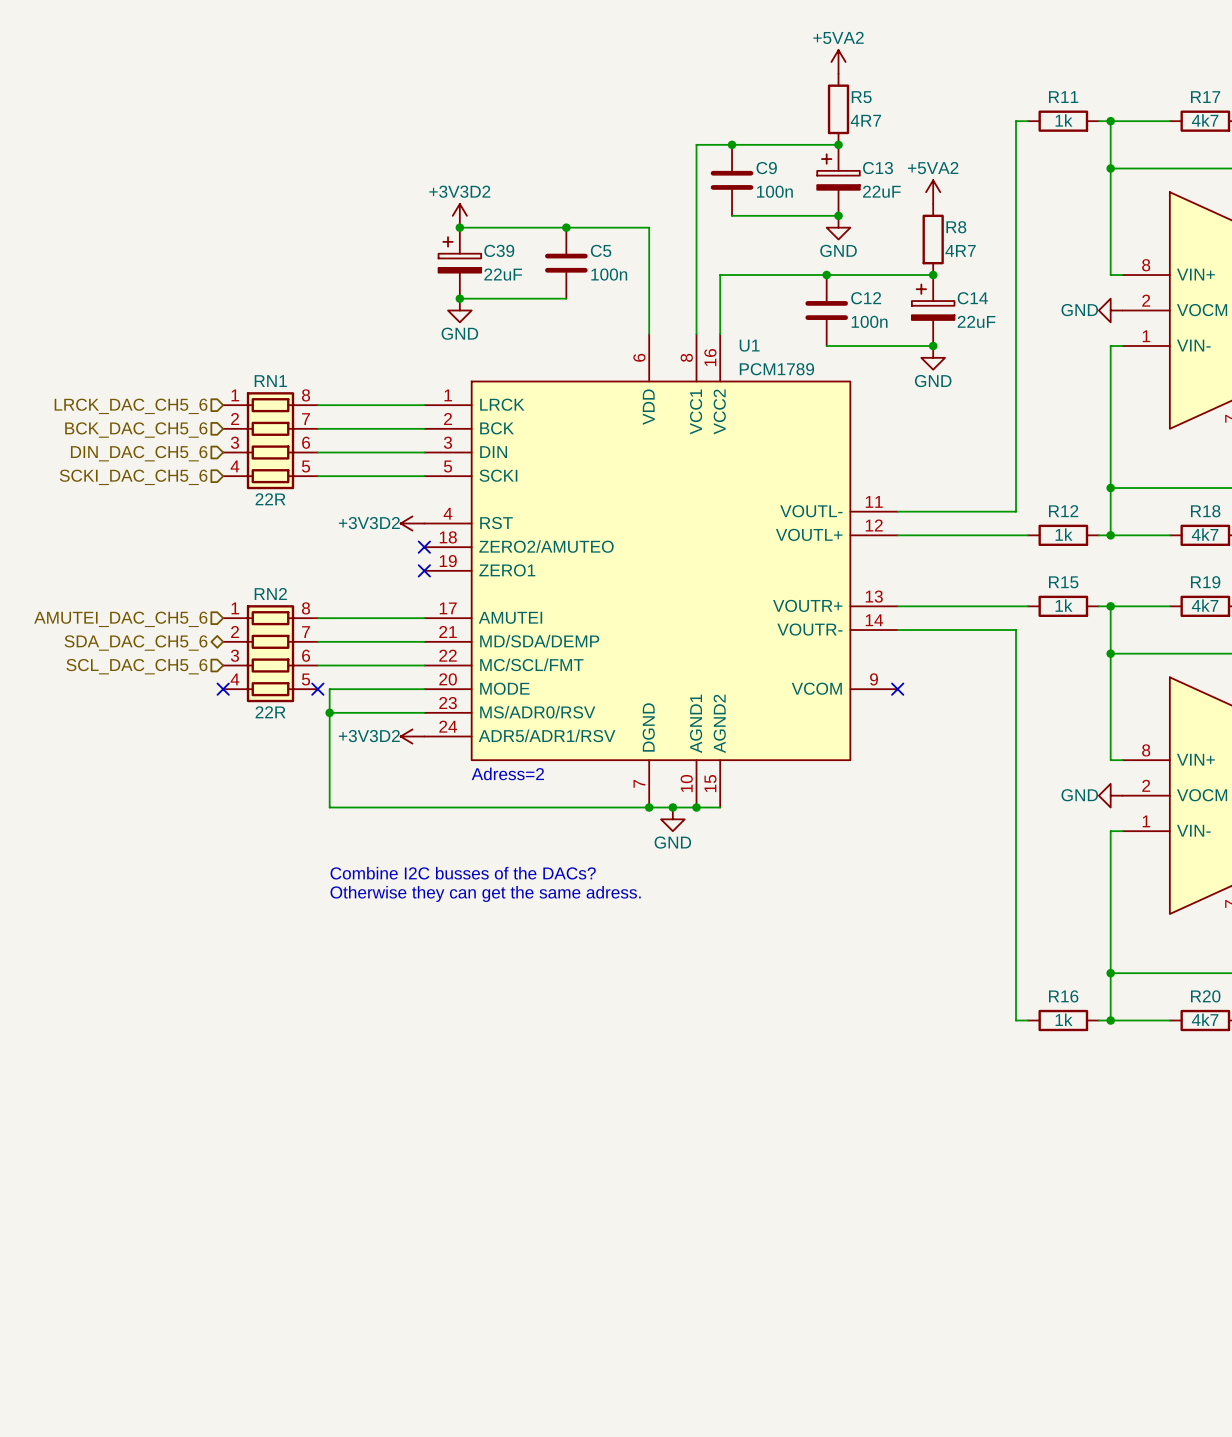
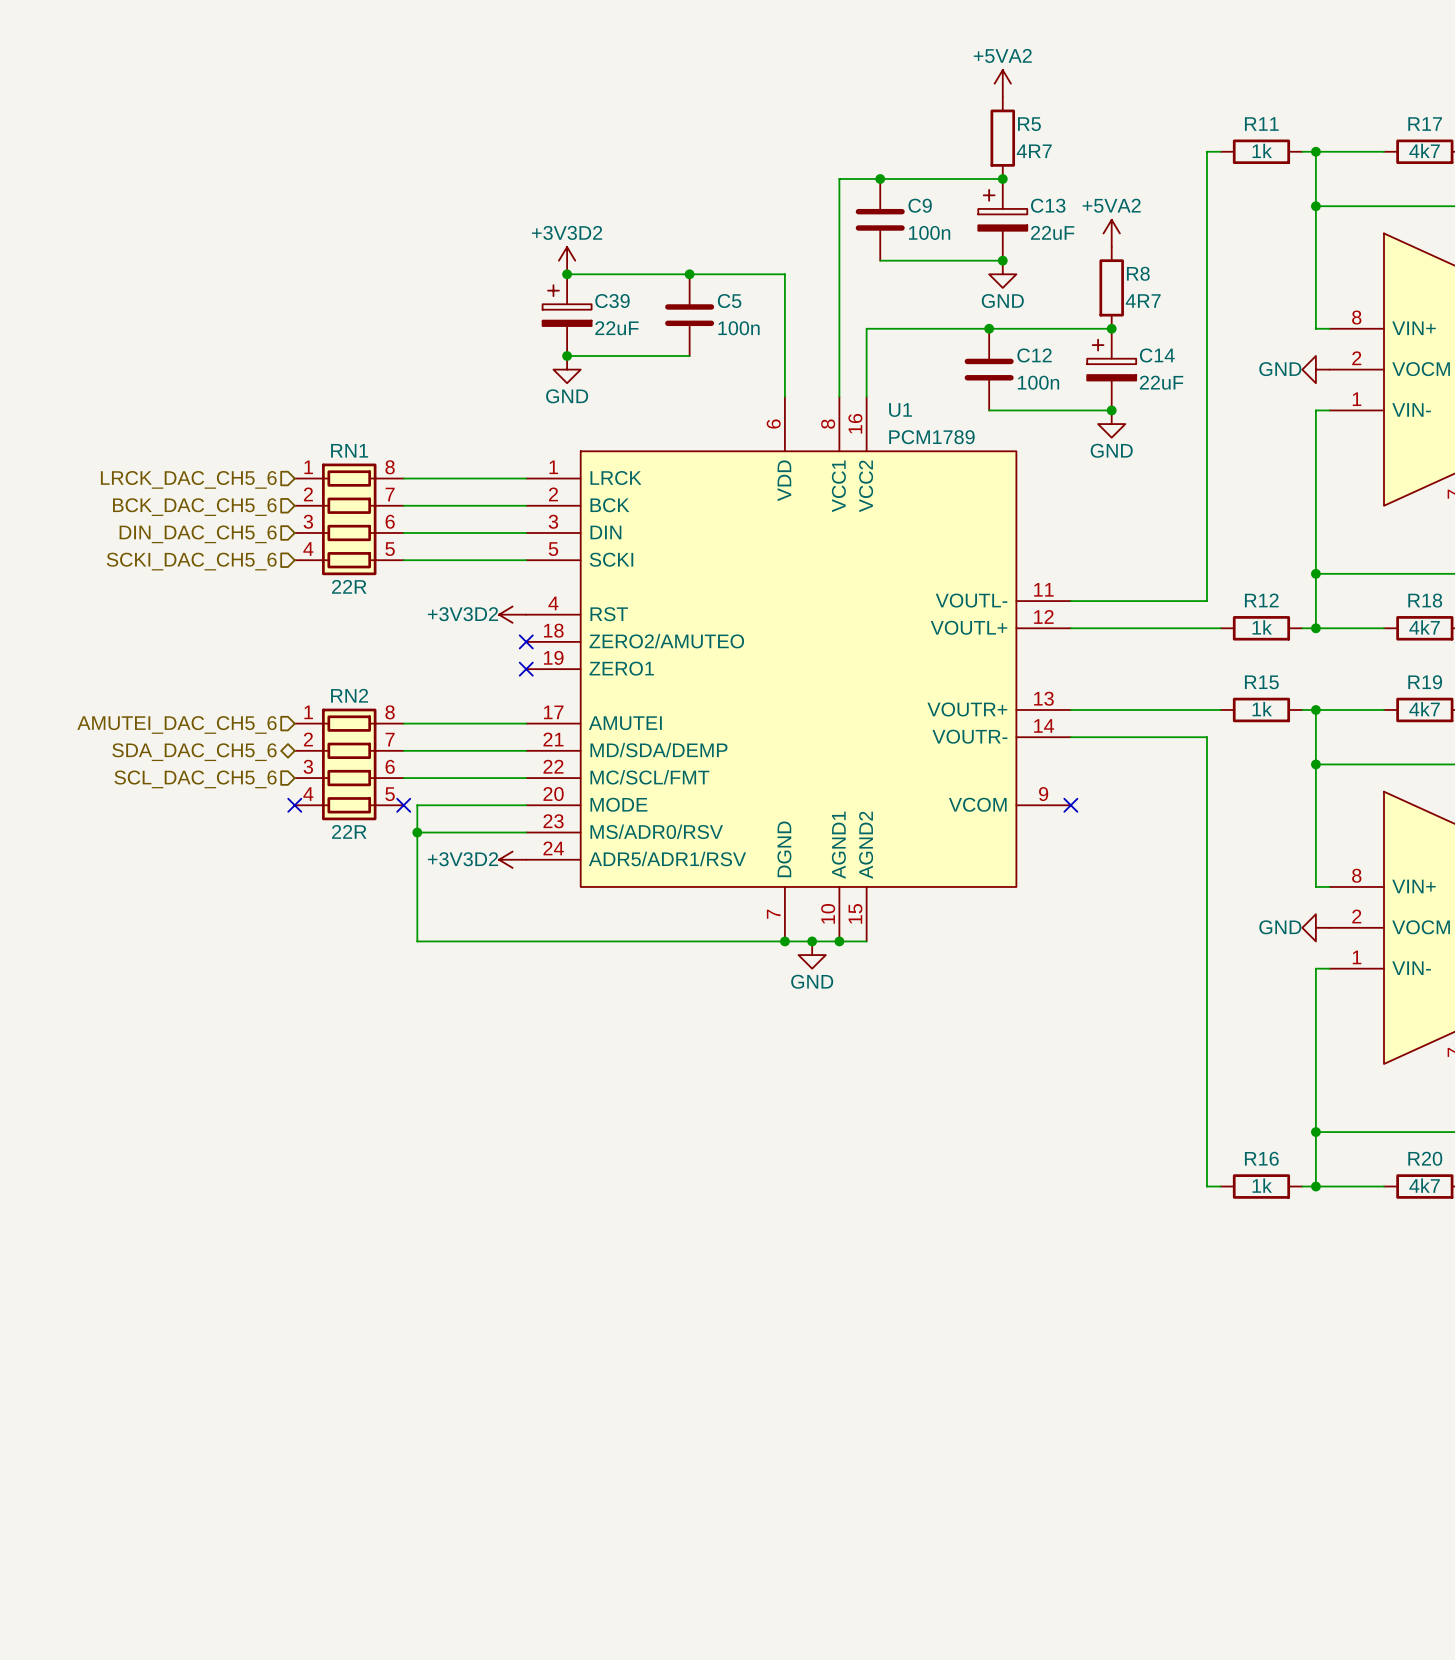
text: Adress=2 (507, 773) -> none
text: Combine I2C busses of the DACs? (463, 873) -> none
text: Otherwise they can get the same adress. (485, 893) -> none

